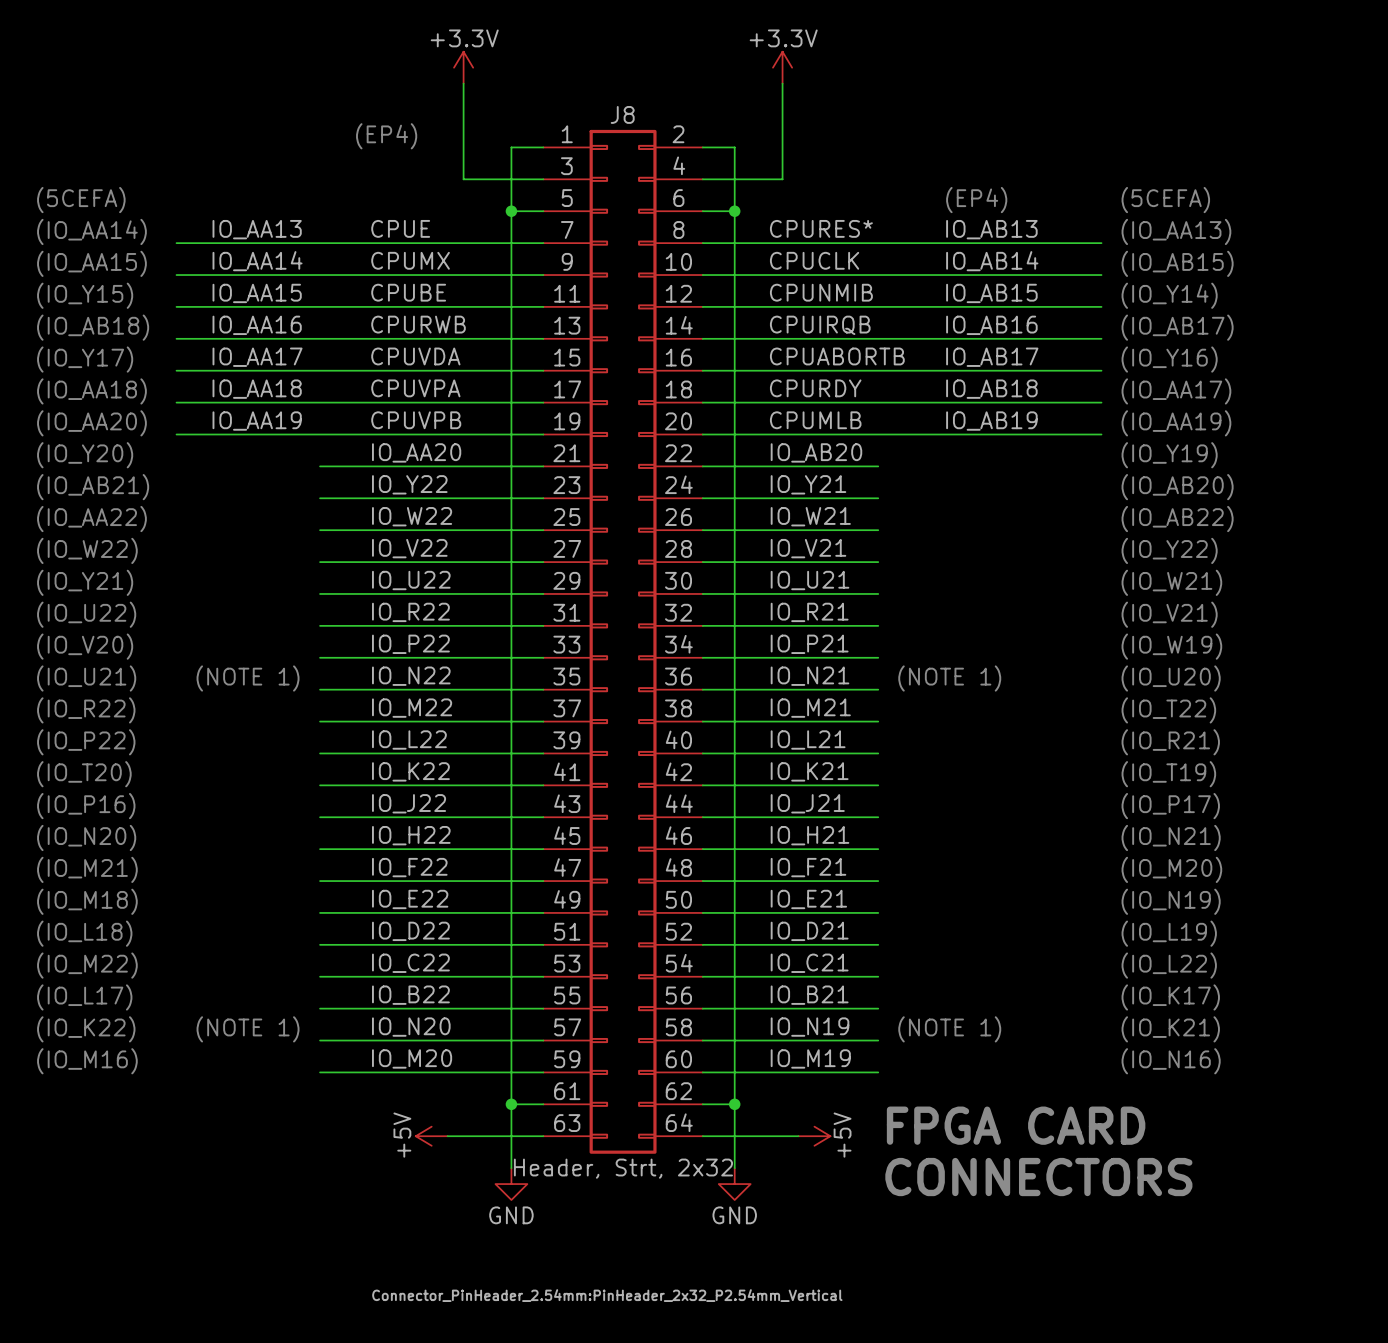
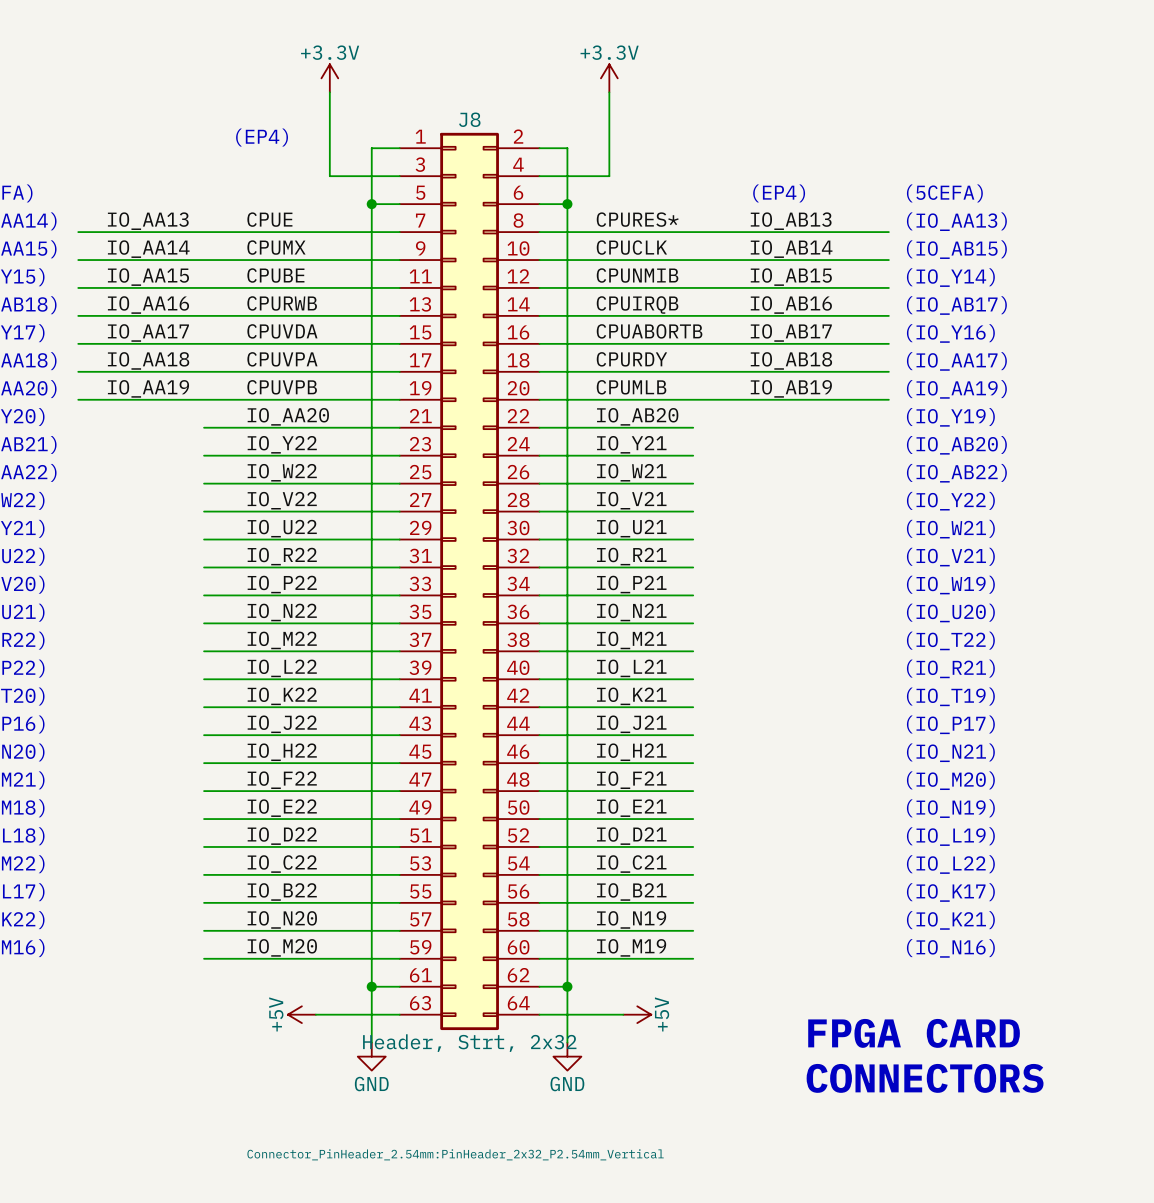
text: (NOTE 1) (248, 678) -> none
text: (NOTE 1) (949, 678) -> none
text: (NOTE 1) (248, 1029) -> none
text: (NOTE 1) (949, 1029) -> none
text position: FPGA CARD (1016, 1125) -> FPGA CARD (914, 1033)
text position: CONNECTORS (1038, 1177) -> CONNECTORS (925, 1078)

